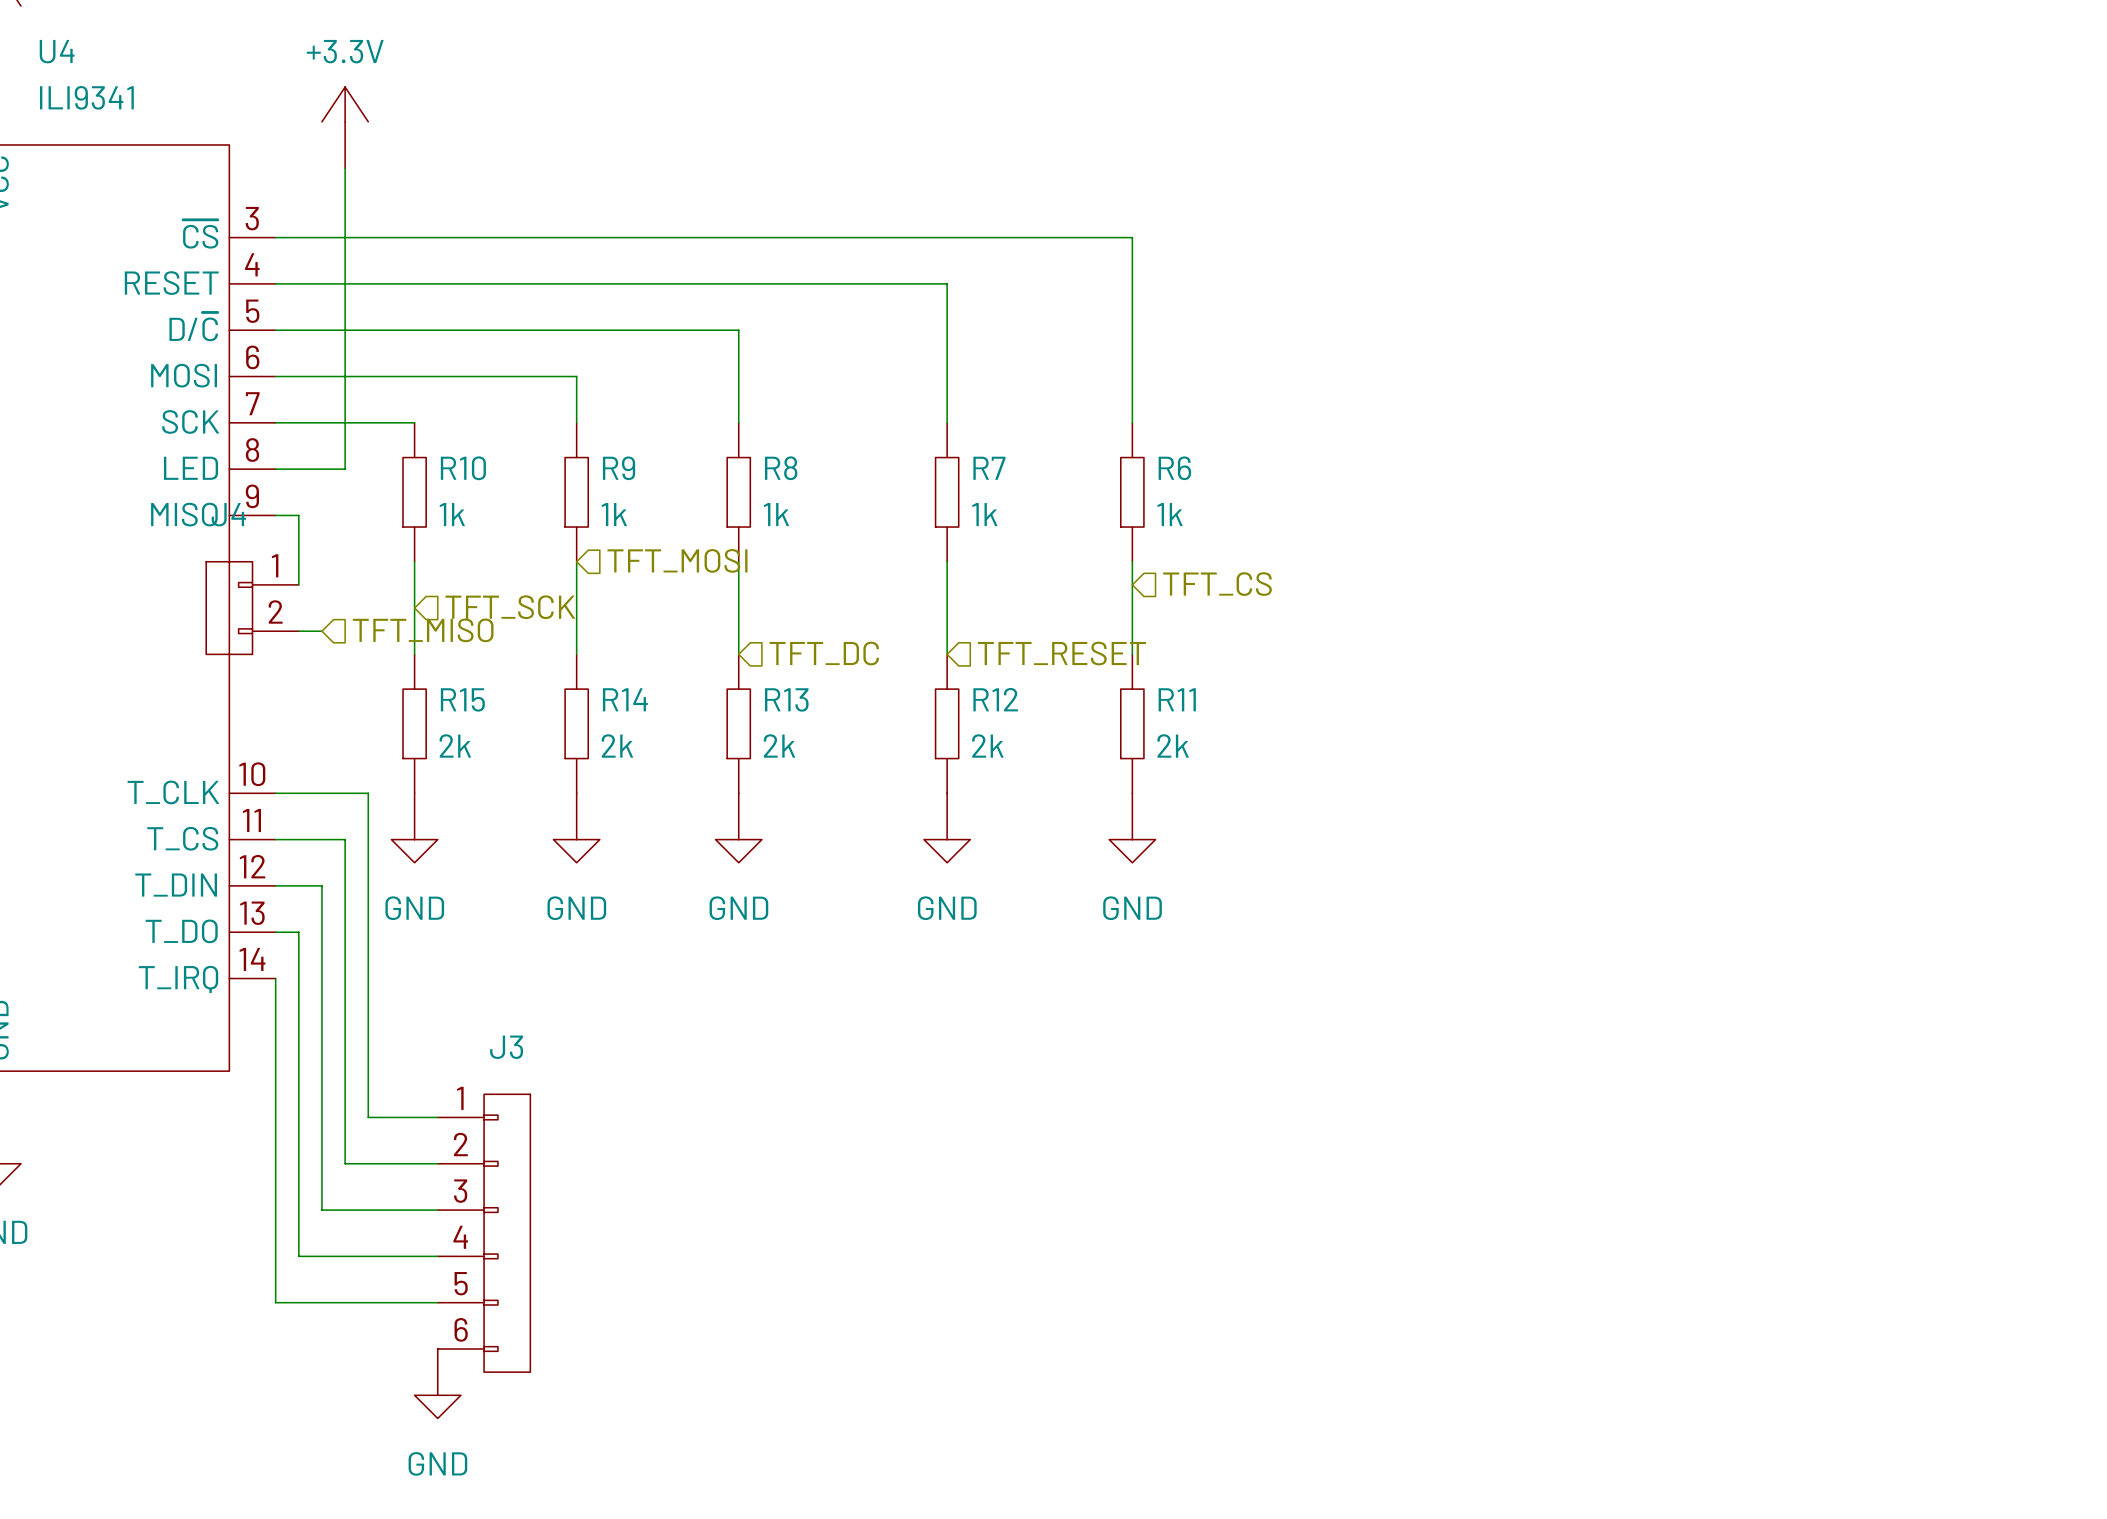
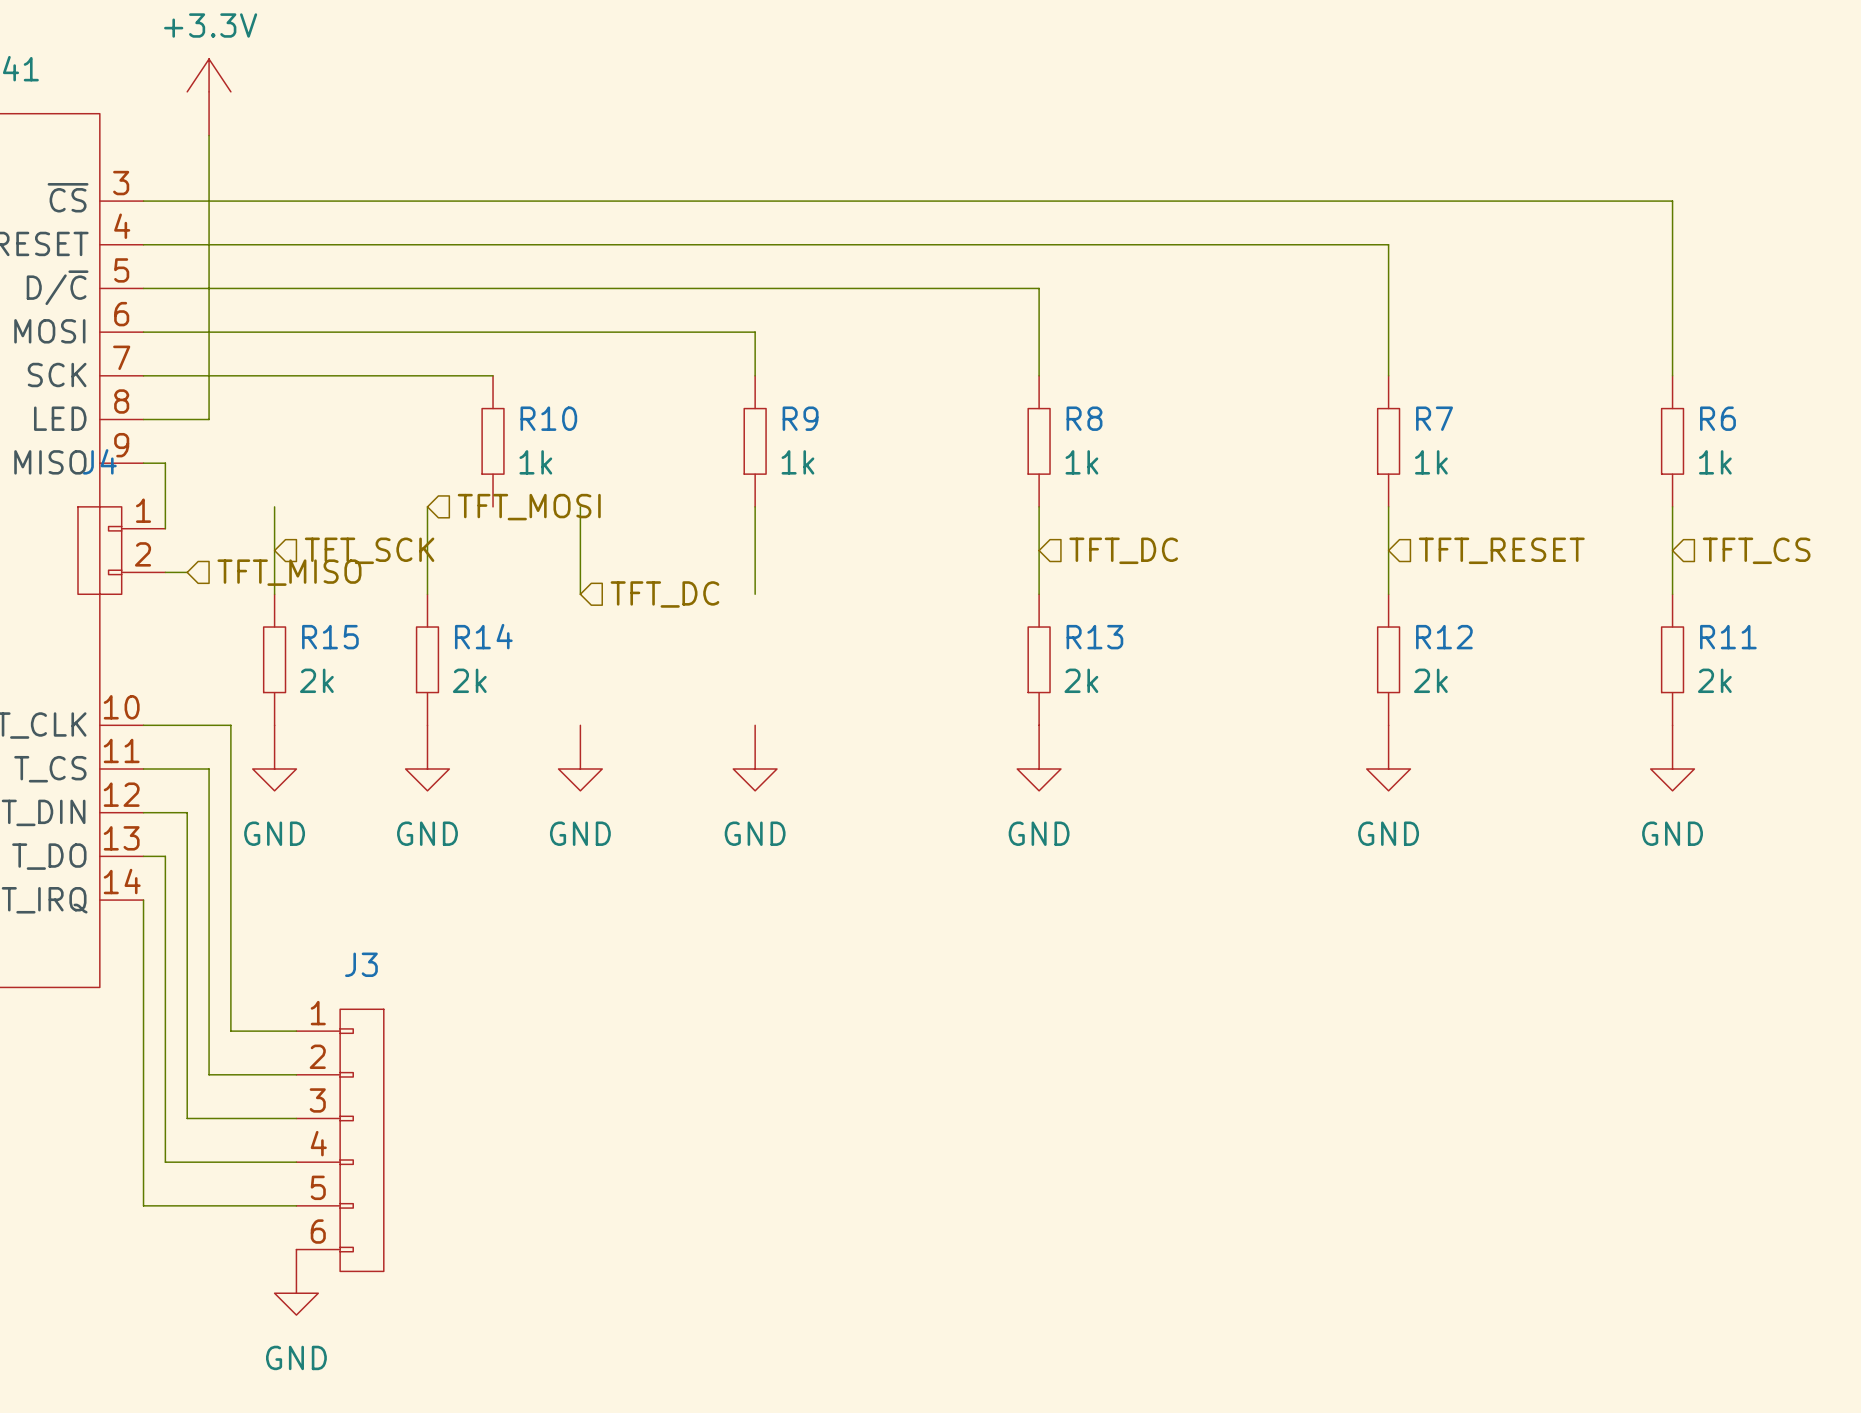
wire: (1132, 237) (1132, 422) -> (951, 201) (1672, 201) (1672, 375)
wire: (947, 283) (947, 422) -> (776, 244) (1388, 244) (1388, 375)
wire: (738, 330) (738, 422) -> (580, 288) (1039, 288) (1039, 375)
wire: (576, 376) (576, 422) -> (427, 332) (755, 332) (755, 375)
wire: none -> (274, 375) (493, 375)
R10 position: (414, 492) -> (493, 441)
R9 position: (576, 492) -> (755, 441)
R8 position: (738, 492) -> (1039, 441)
R7 position: (947, 492) -> (1388, 441)
R6 position: (1132, 492) -> (1672, 441)
wire: (947, 561) (947, 654) -> (755, 506) (755, 594)
wire: (1132, 561) (1132, 654) -> (1039, 506) (1039, 594)
wire: none -> (1388, 506) (1388, 594)
wire: none -> (1672, 506) (1672, 594)
hierarchical label: TFT_CS (1217, 584) -> TFT_DC (1123, 550)
hierarchical label: none -> TFT_RESET (1501, 550)
hierarchical label: none -> TFT_CS (1756, 550)
hierarchical label: TFT_RESET (1061, 653) -> none
R13 position: (738, 723) -> (1039, 659)
R12 position: (947, 723) -> (1388, 659)
R11 position: (1132, 723) -> (1672, 659)
power symbol position: GND (947, 828) -> GND (755, 758)
power symbol position: GND (1132, 828) -> GND (1039, 758)
power symbol: none -> GND (1388, 758)
power symbol: none -> GND (1672, 758)

